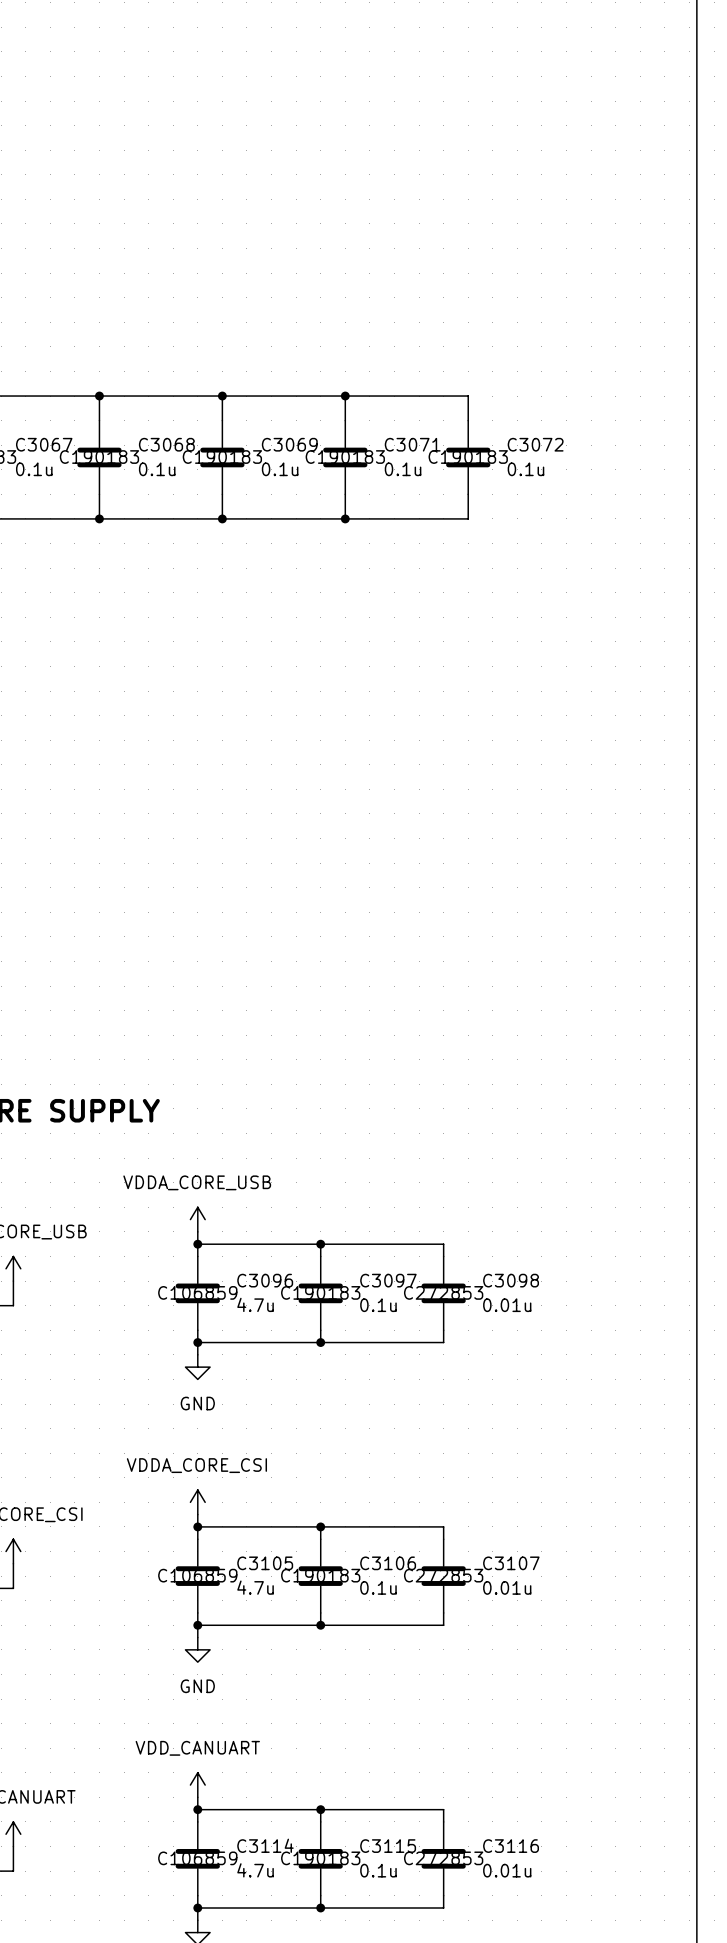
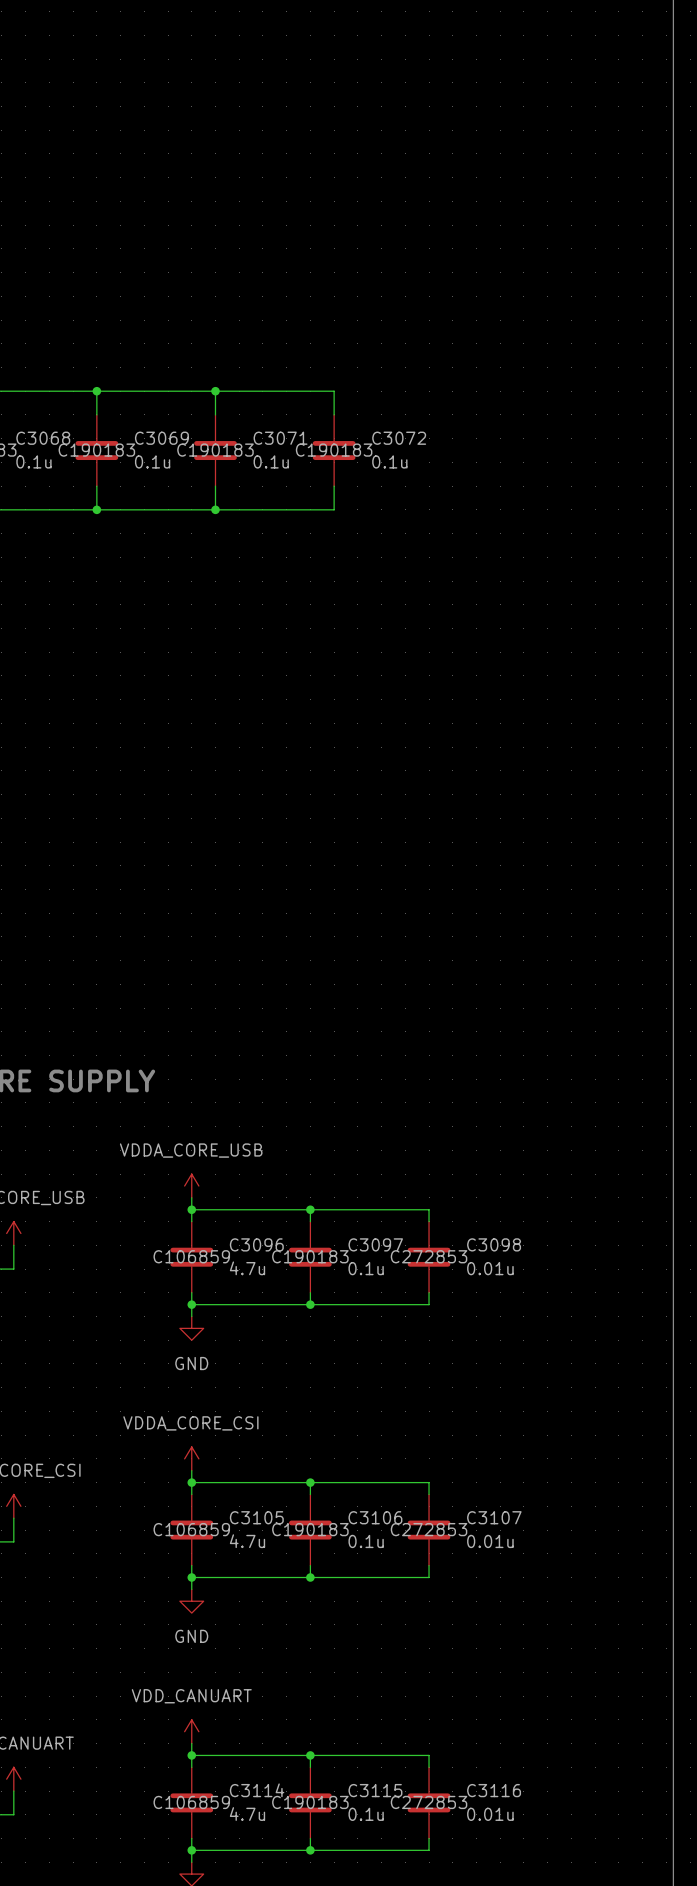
wire: (345, 396) (468, 396) (468, 420) -> none
junction: (345, 396) -> none
C3067 name: C3067 (44, 444) -> C3068 (43, 438)
C3068 name: C3068 (166, 444) -> C3069 (161, 438)
C3069 name: C3069 (289, 444) -> C3071 (280, 438)
C3071 name: C3071 (412, 444) -> C3072 (399, 438)
C3072: 0.1u (468, 457) -> none
wire: (468, 494) (468, 518) (345, 518) -> none
junction: (345, 518) -> none

